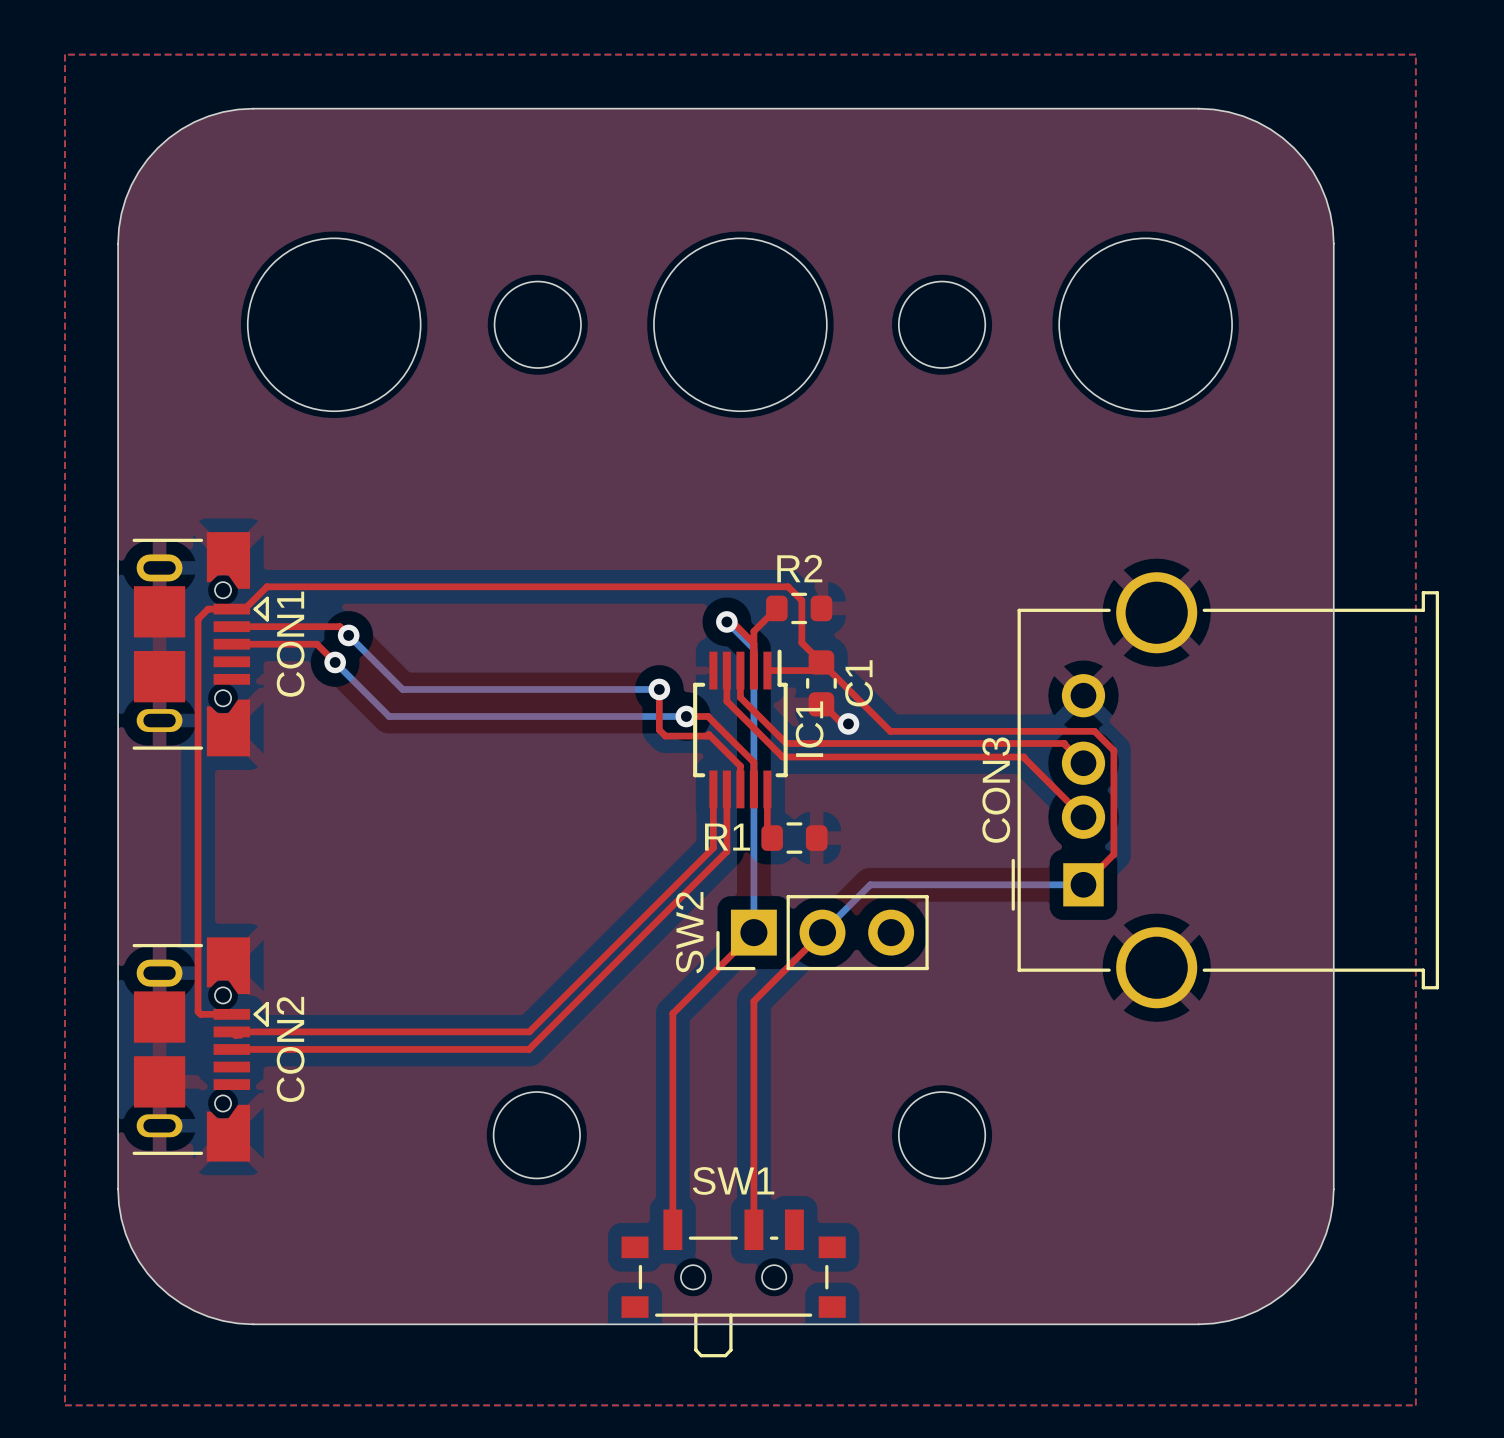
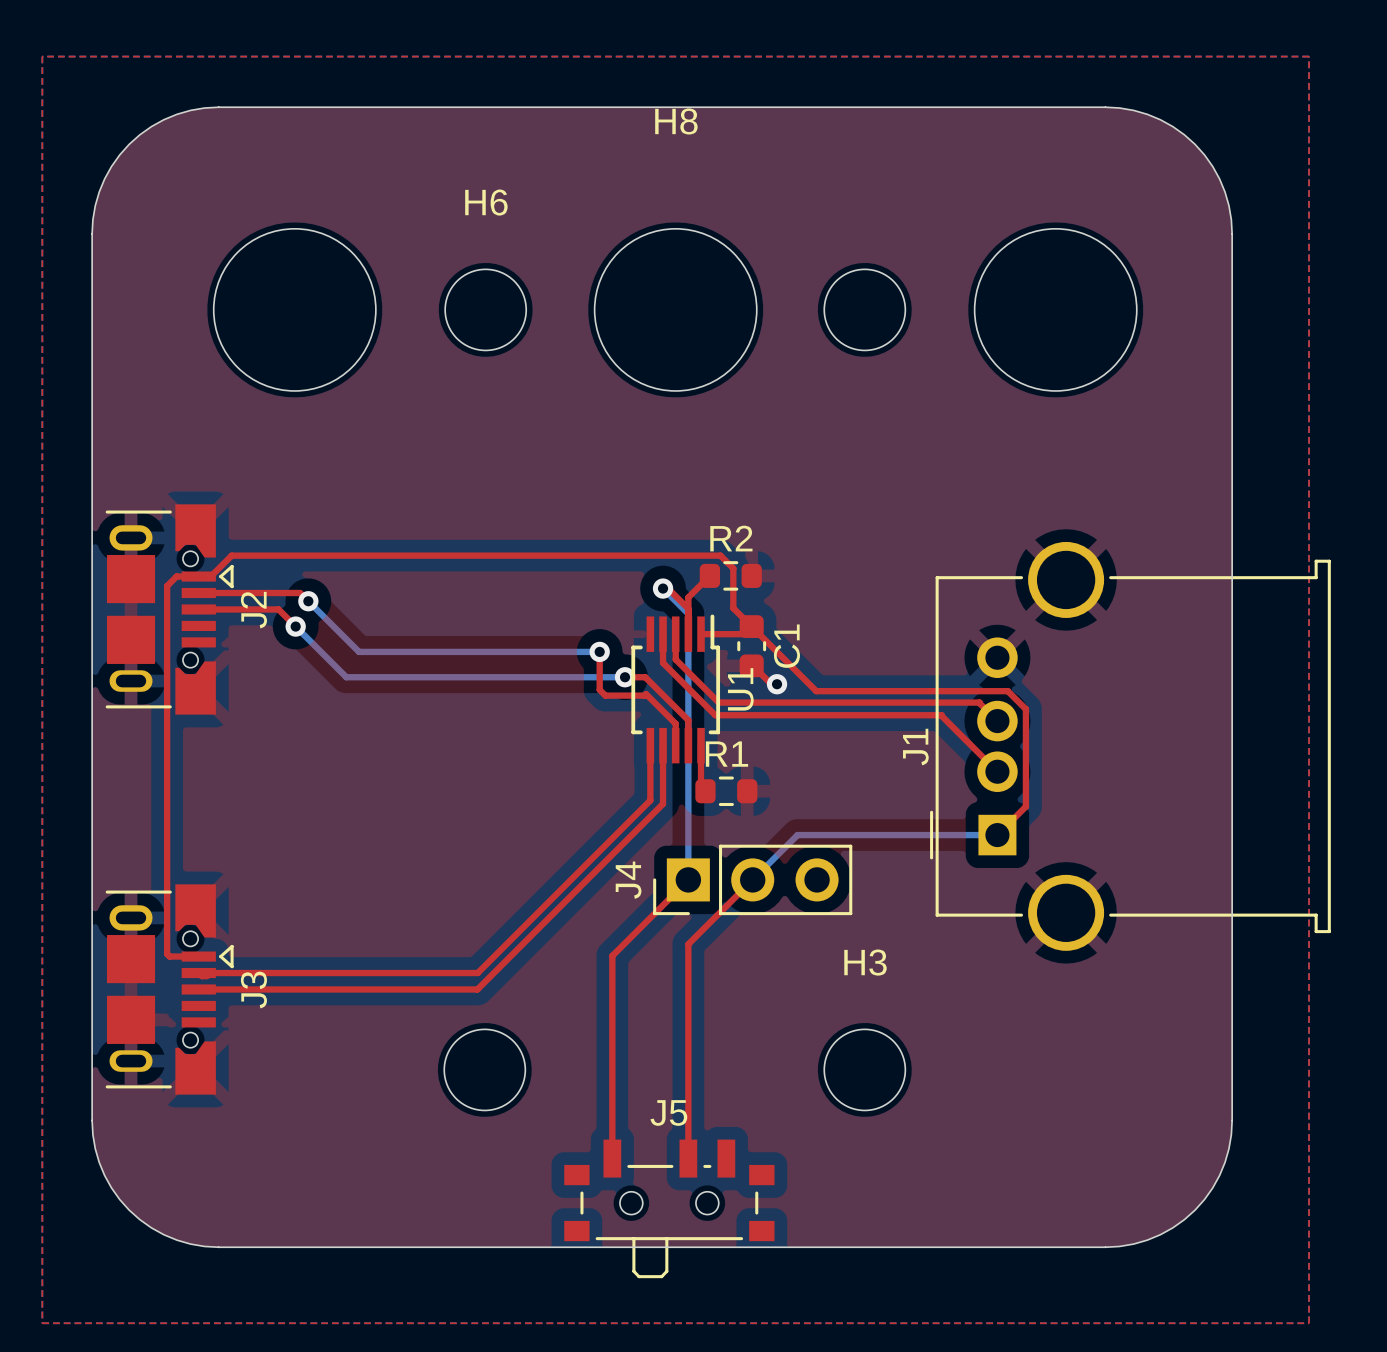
H8 name: none -> H8 (676, 121)
H6 name: none -> H6 (486, 202)
CON1 name: CON1 (290, 644) -> J2 (253, 610)
IC1 name: IC1 (809, 729) -> U1 (740, 689)
CON3 name: CON3 (996, 790) -> J1 (915, 747)
R1 name position: R1 (727, 837) -> R1 (726, 754)
SW2 name: SW2 (689, 932) -> J4 (628, 880)
H3 name: none -> H3 (865, 962)
CON2 name: CON2 (290, 1049) -> J3 (253, 990)
SW1 name: SW1 (733, 1180) -> J5 (668, 1112)

